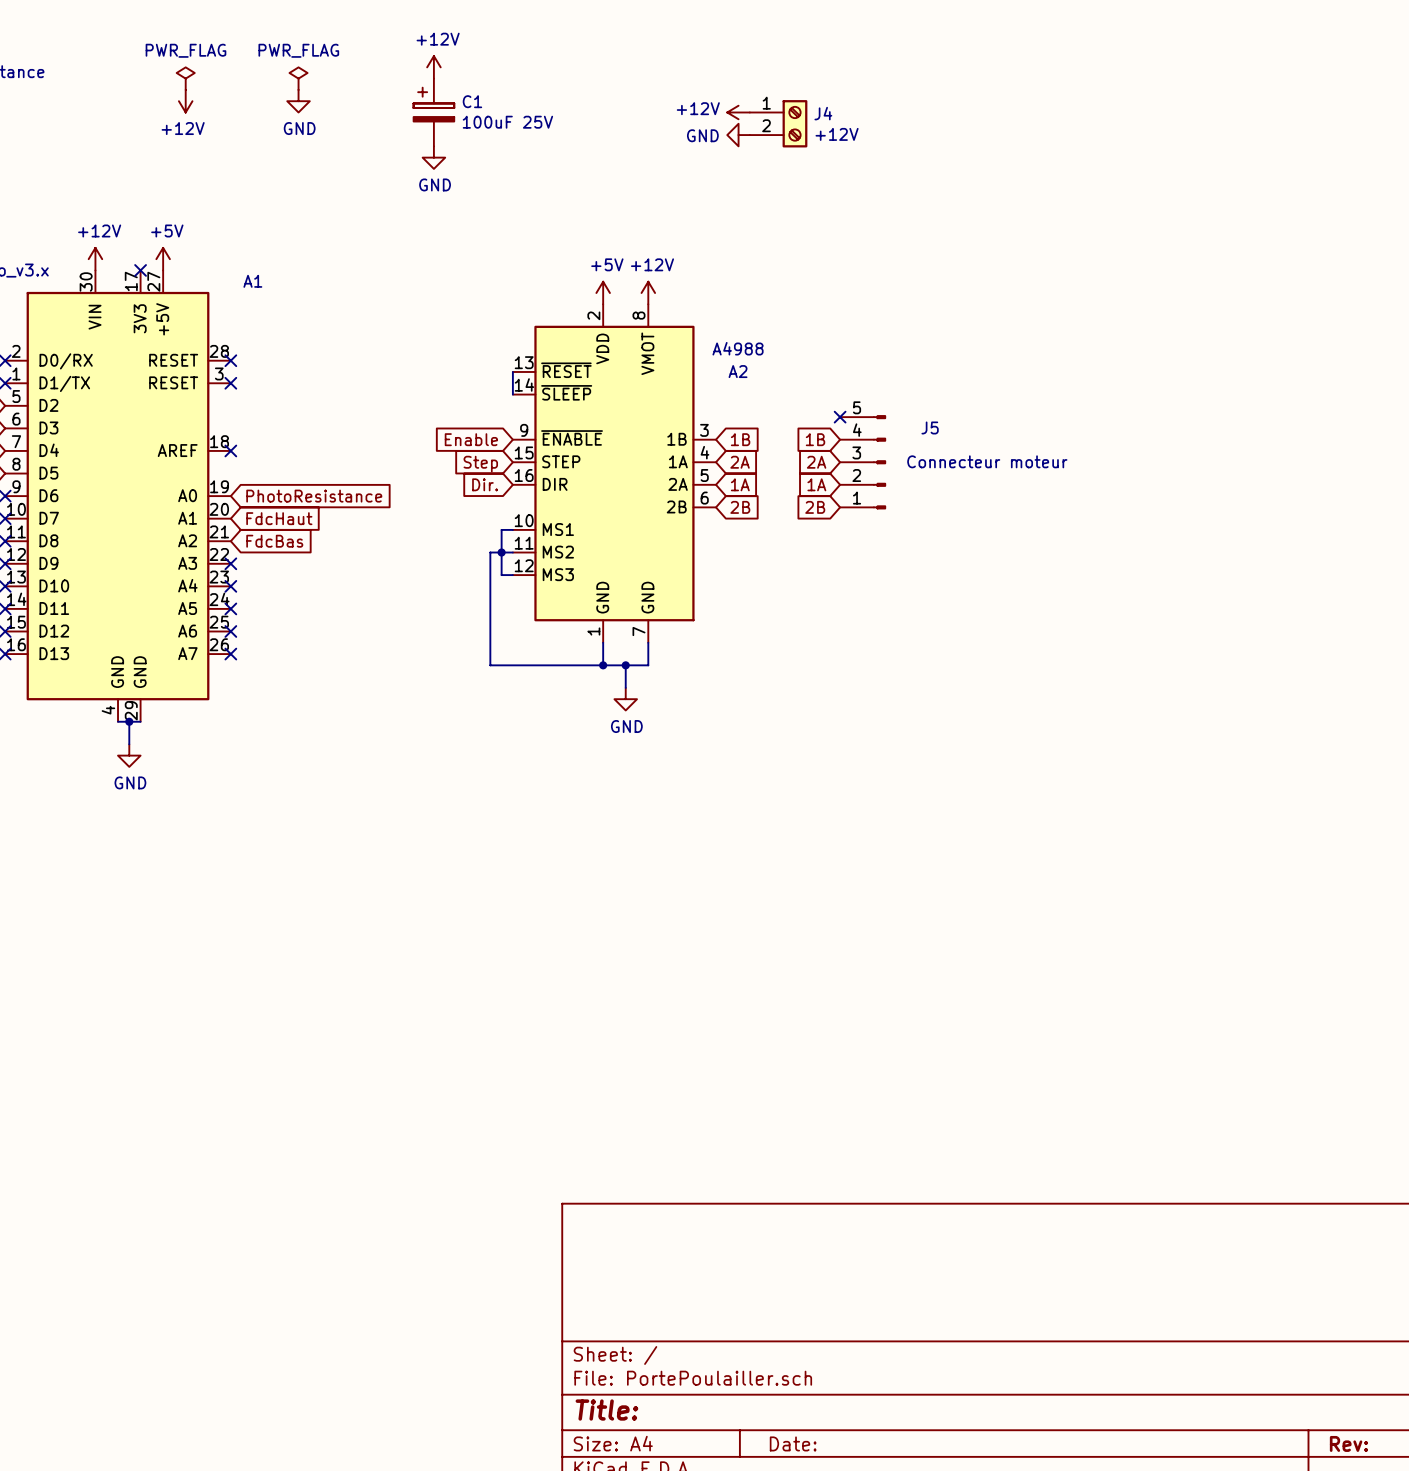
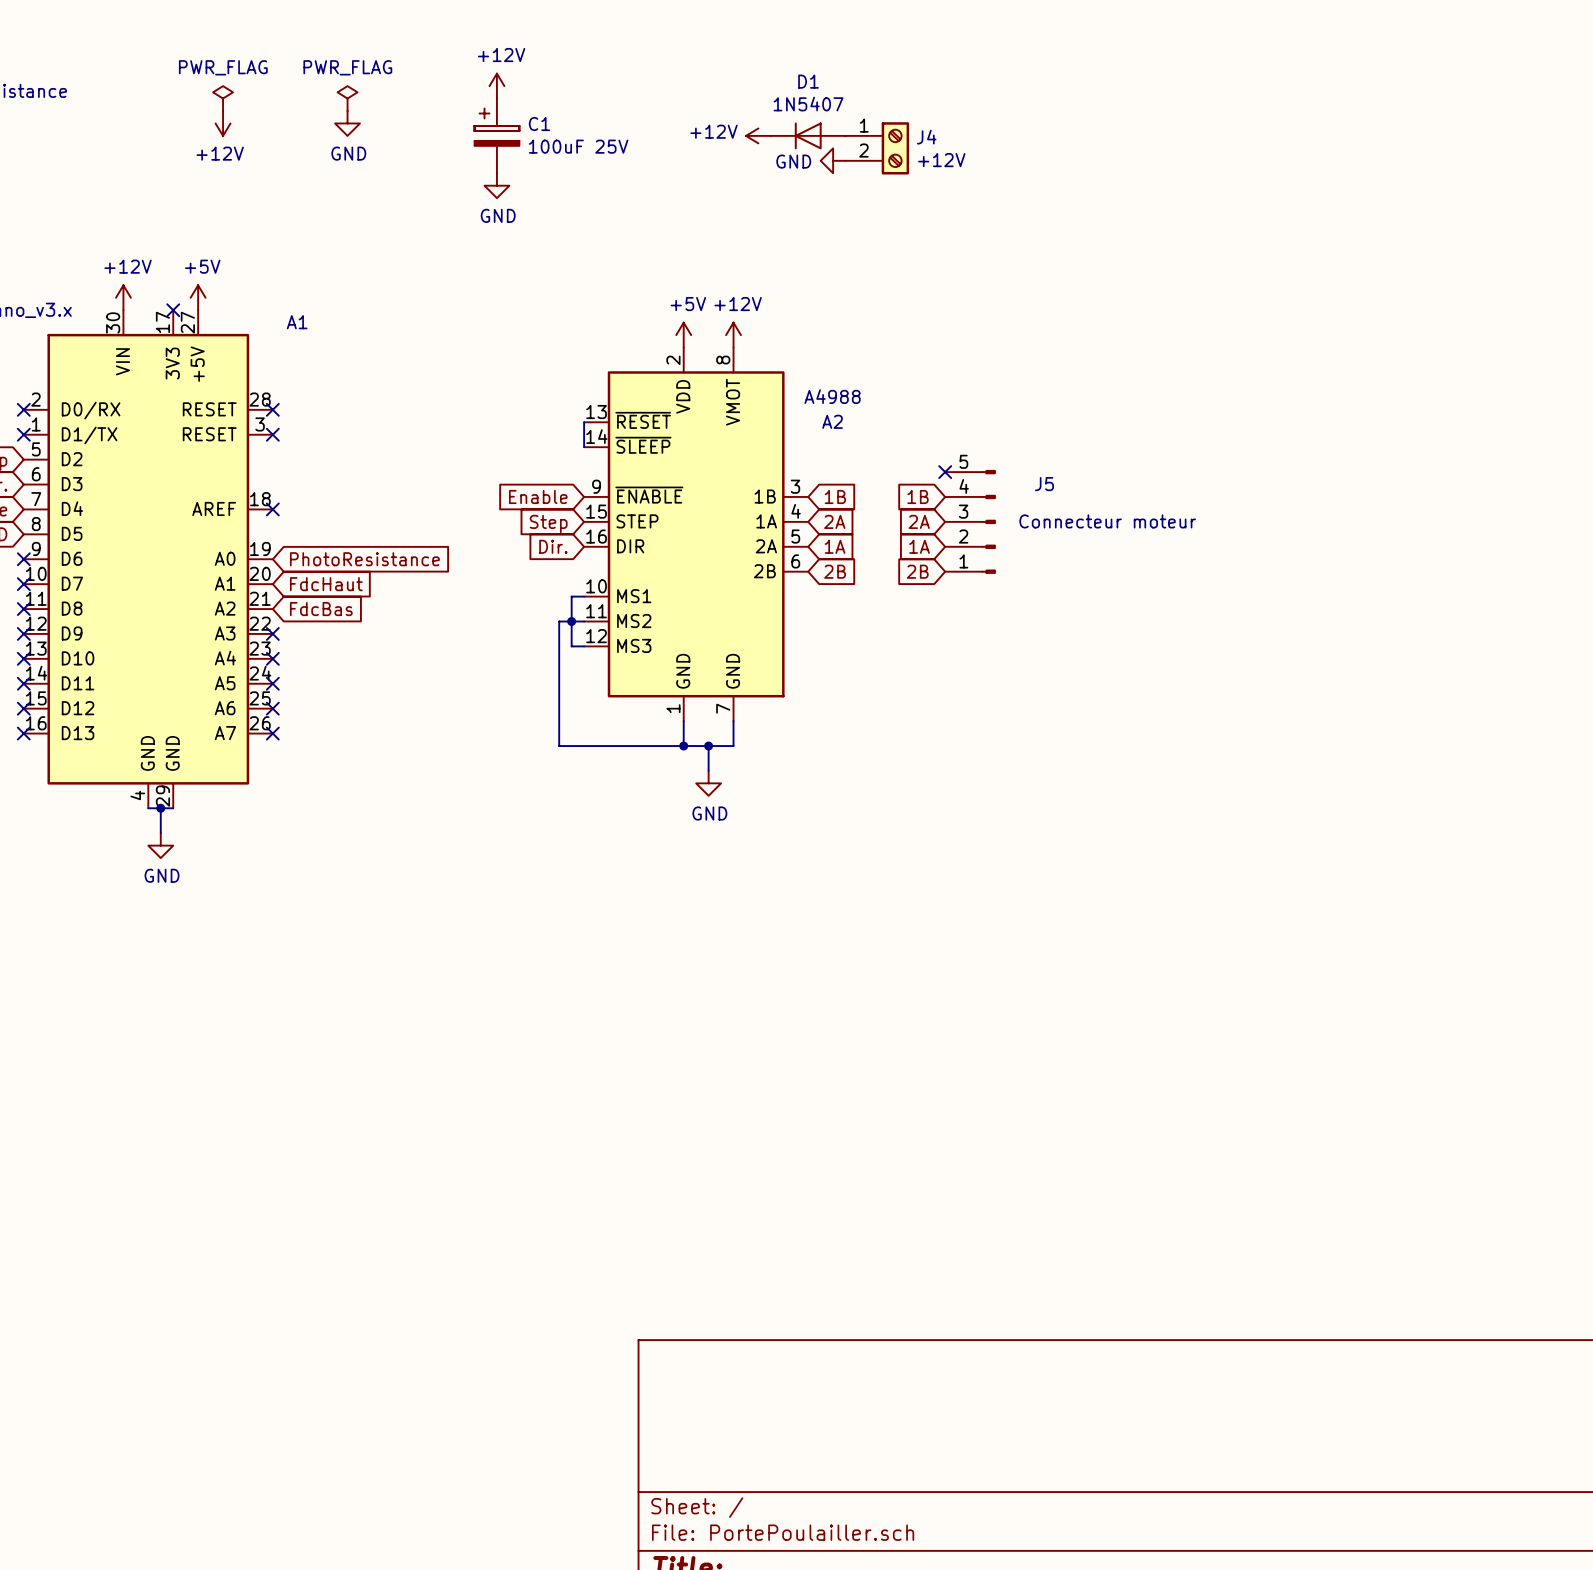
D1: none -> 1N5407 (808, 135)
power symbol position: +12V (738, 112) -> +12V (758, 135)

